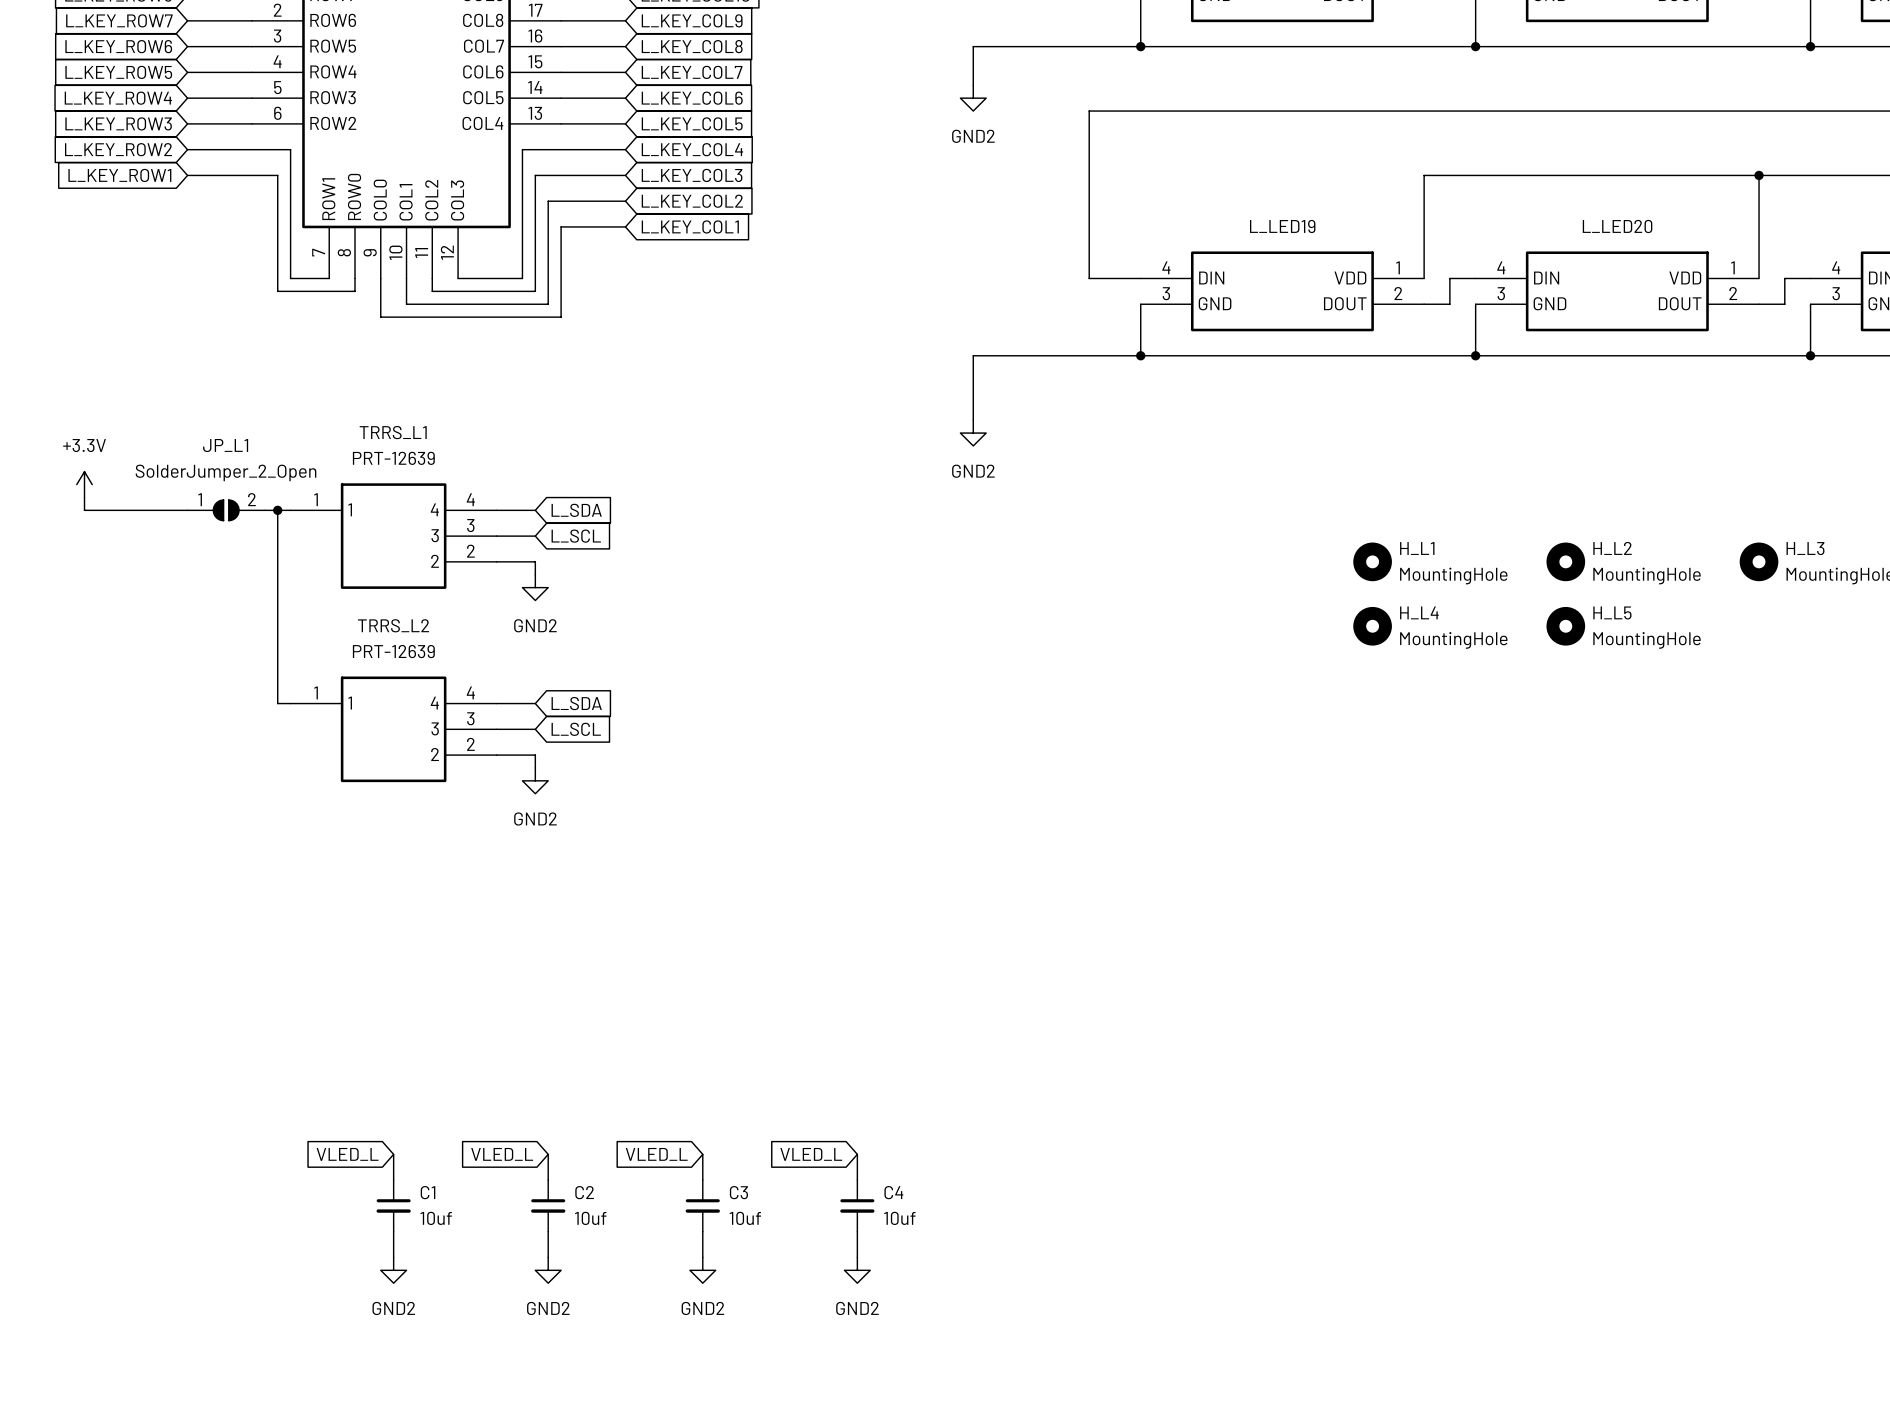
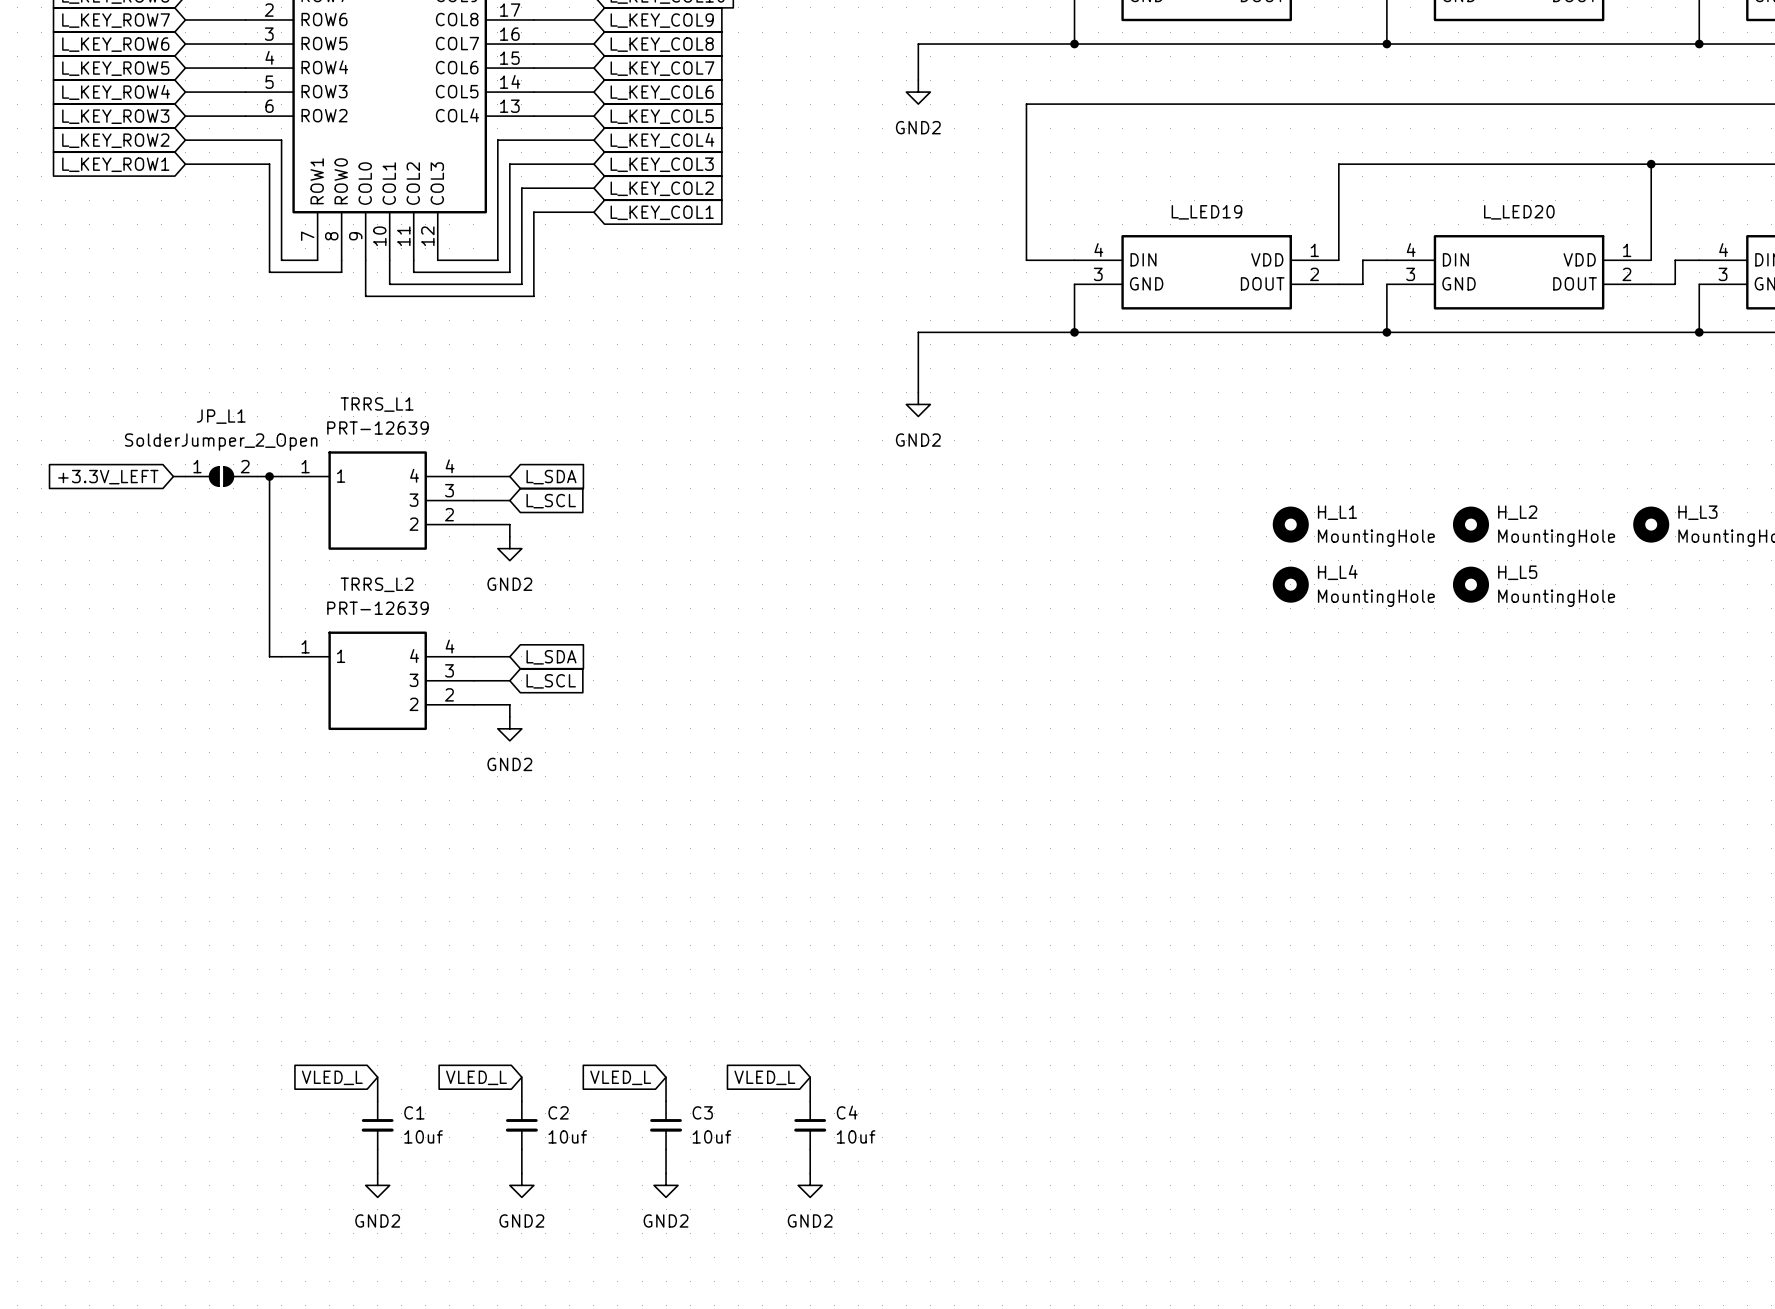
power symbol: +3.3V (84, 484) -> none
wire: (84, 497) (84, 510) (174, 510) -> none
global label: none -> +3.3V_LEFT (108, 477)

